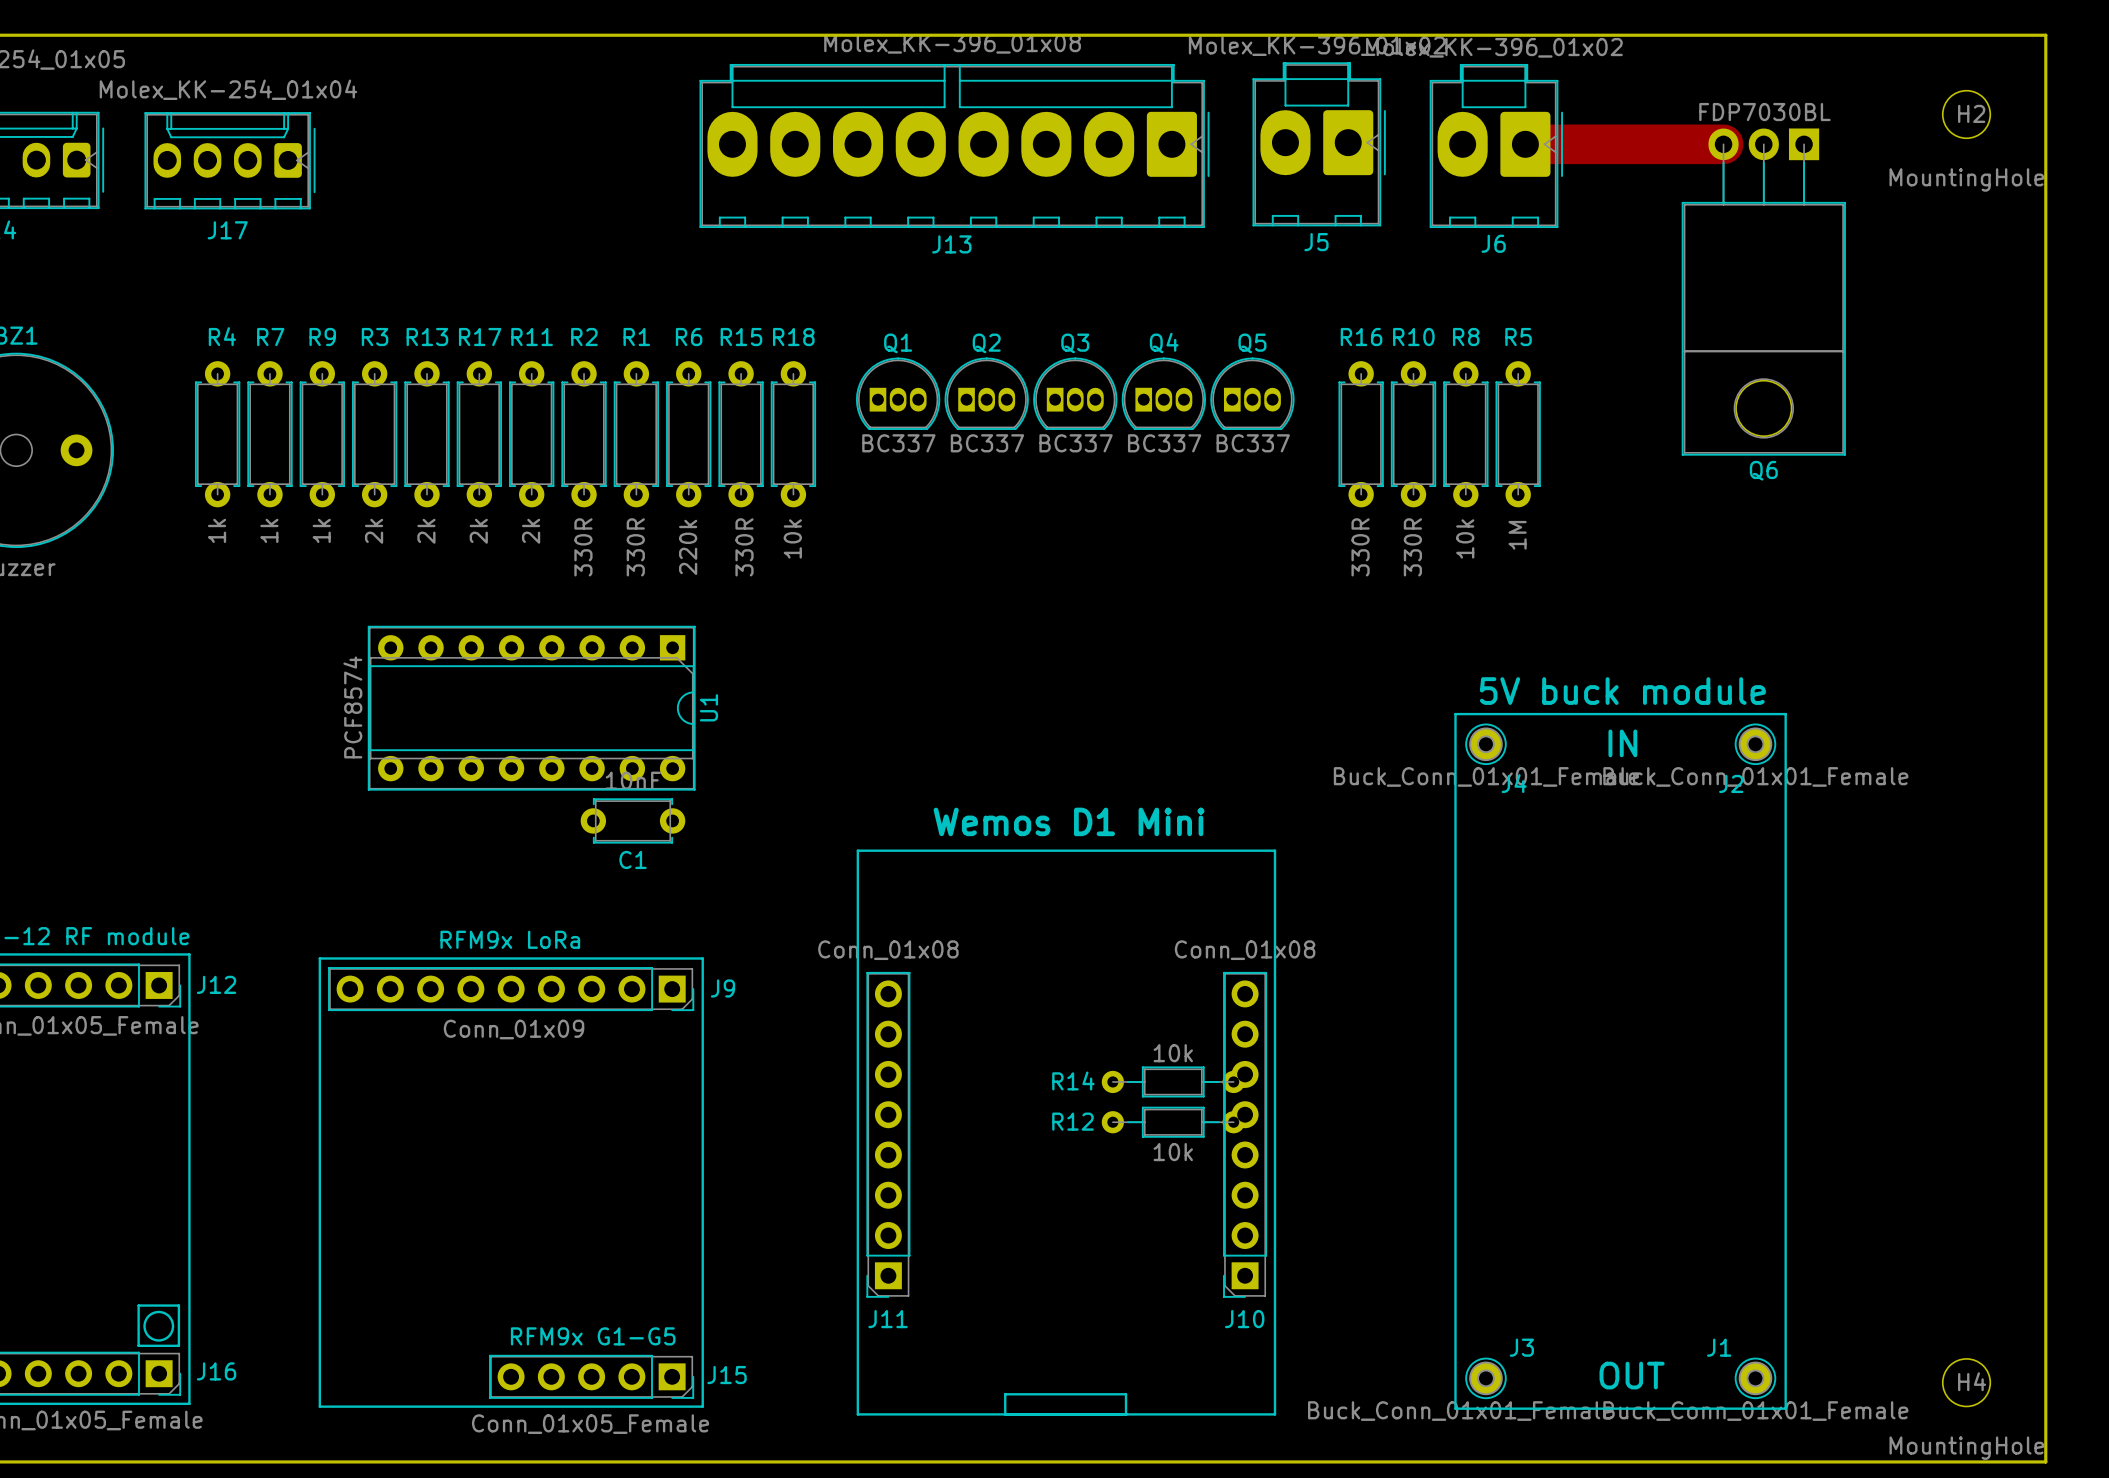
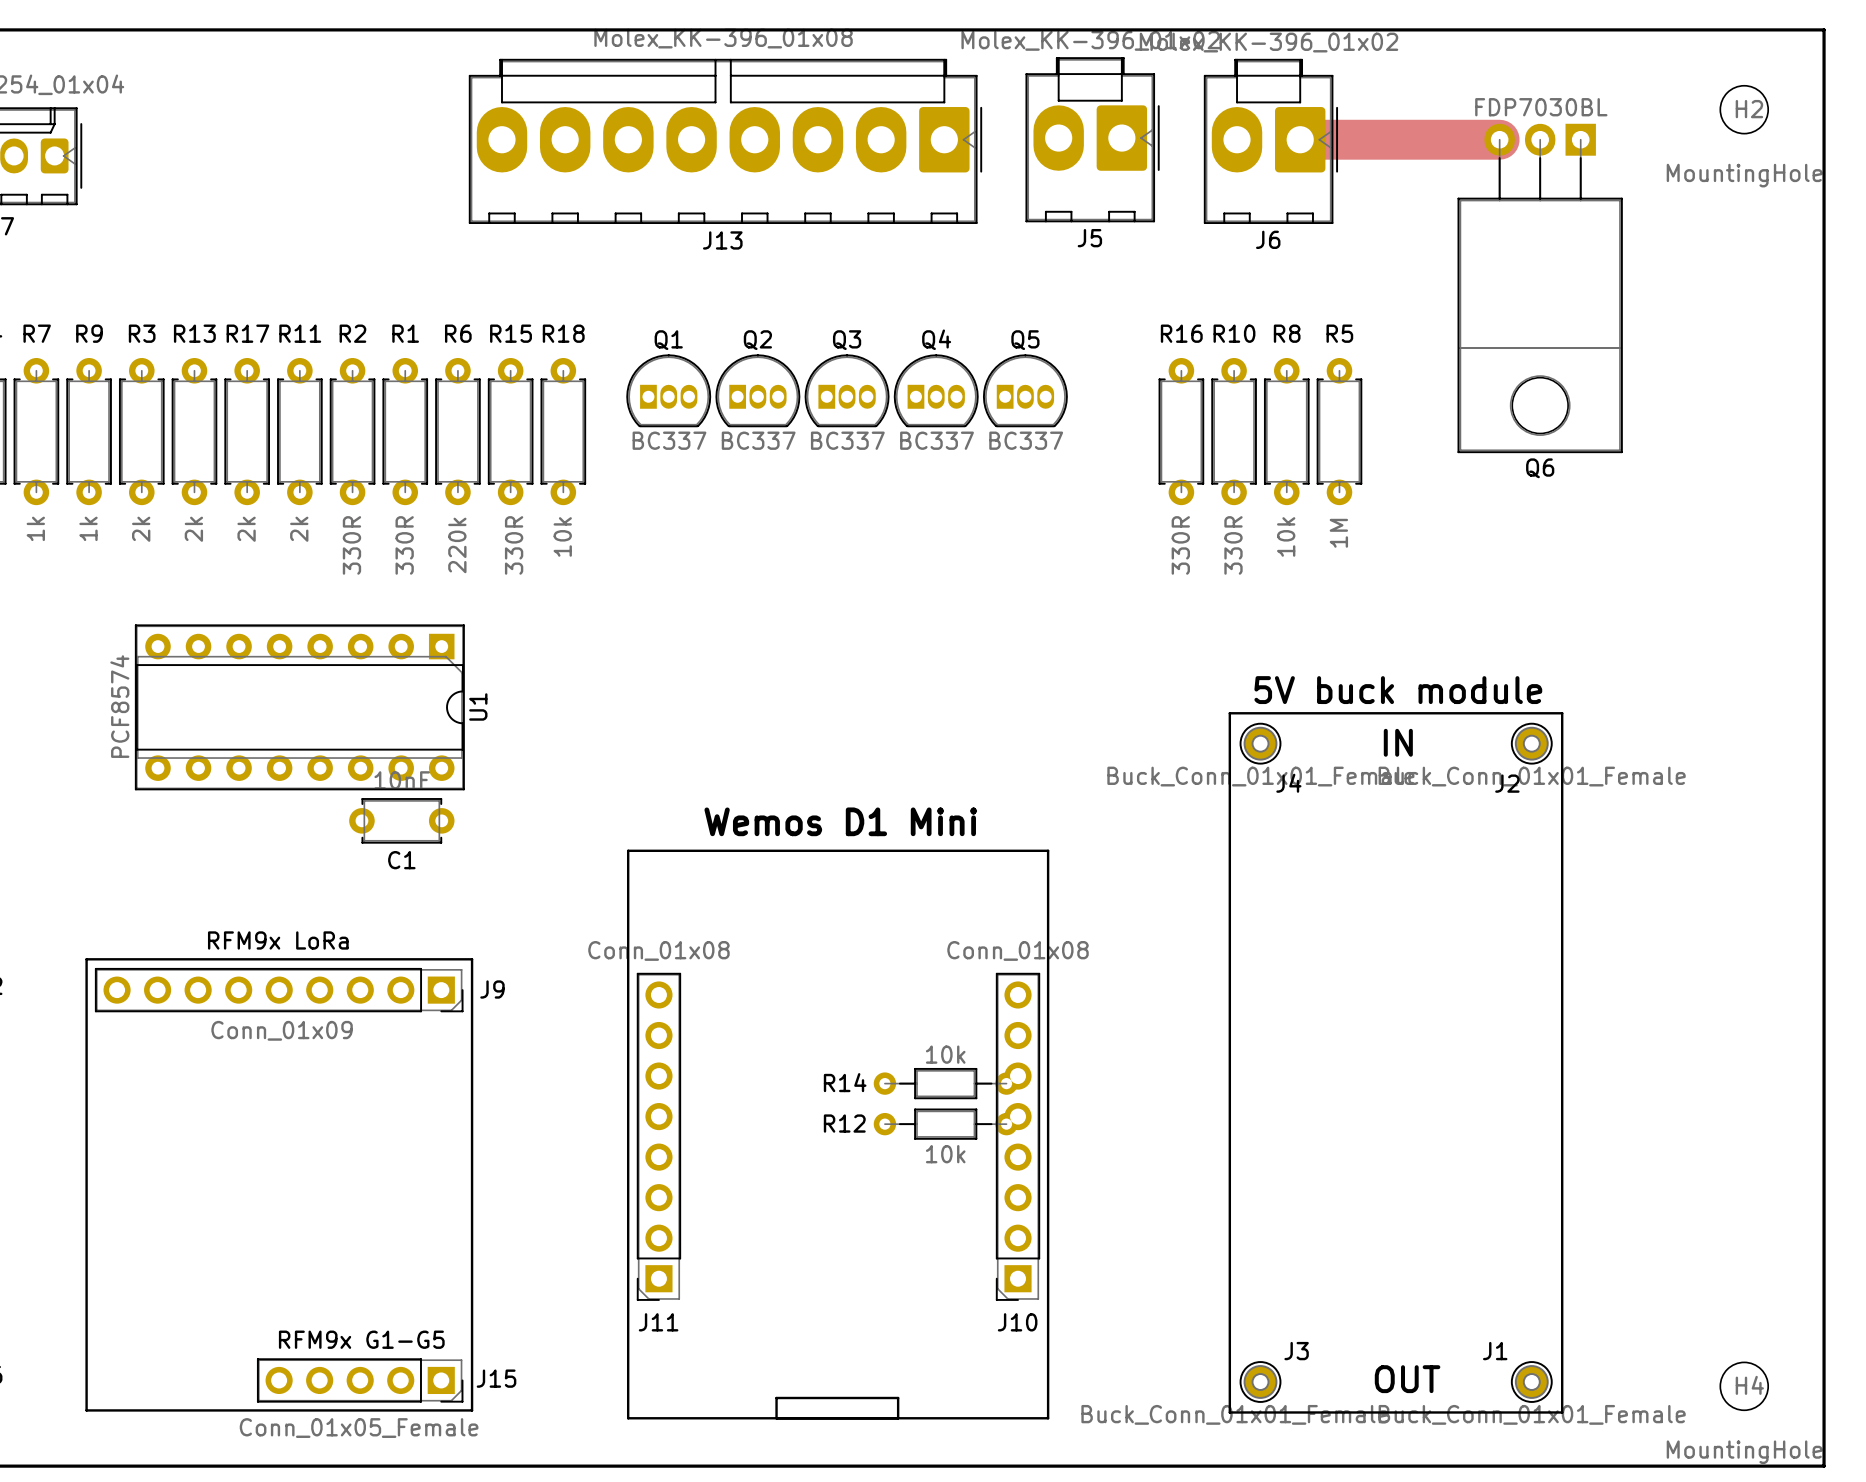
R16 position: (1361, 434) -> (1181, 431)
R10 position: (1413, 434) -> (1234, 431)
R8 position: (1465, 434) -> (1286, 431)
R5 position: (1518, 434) -> (1339, 431)

